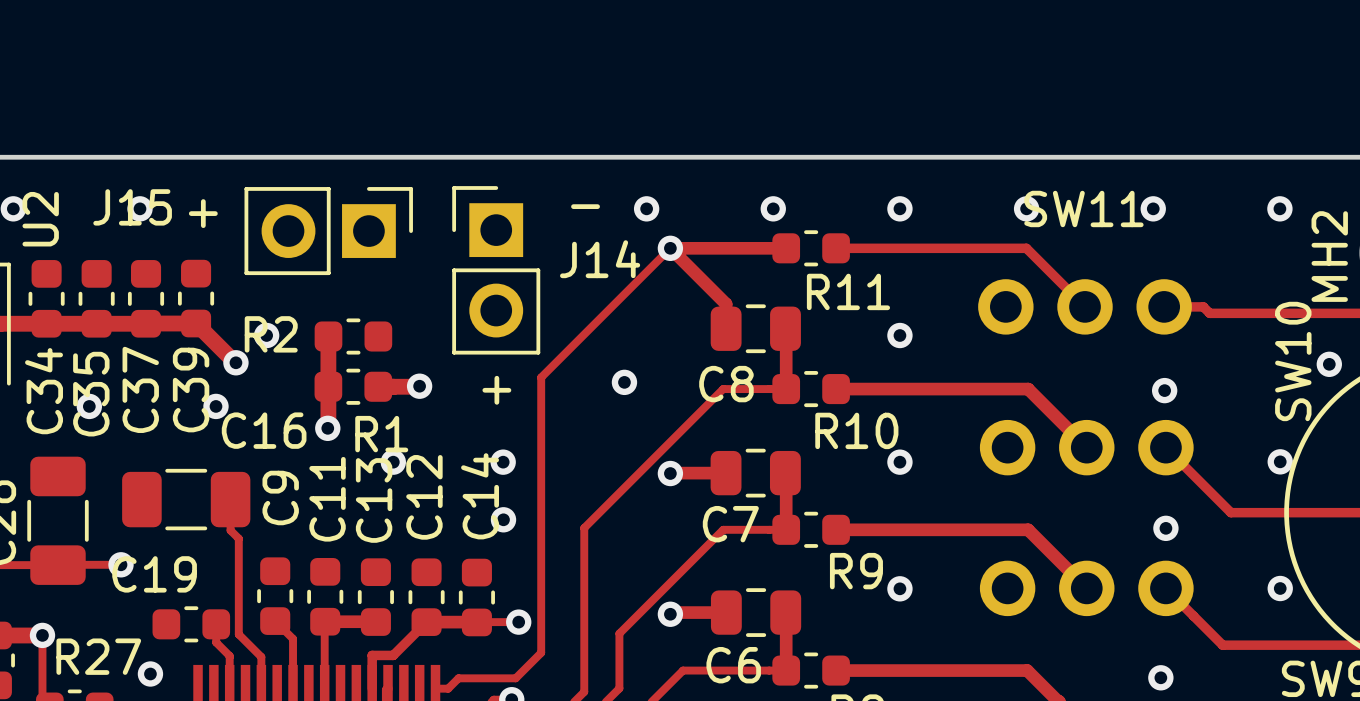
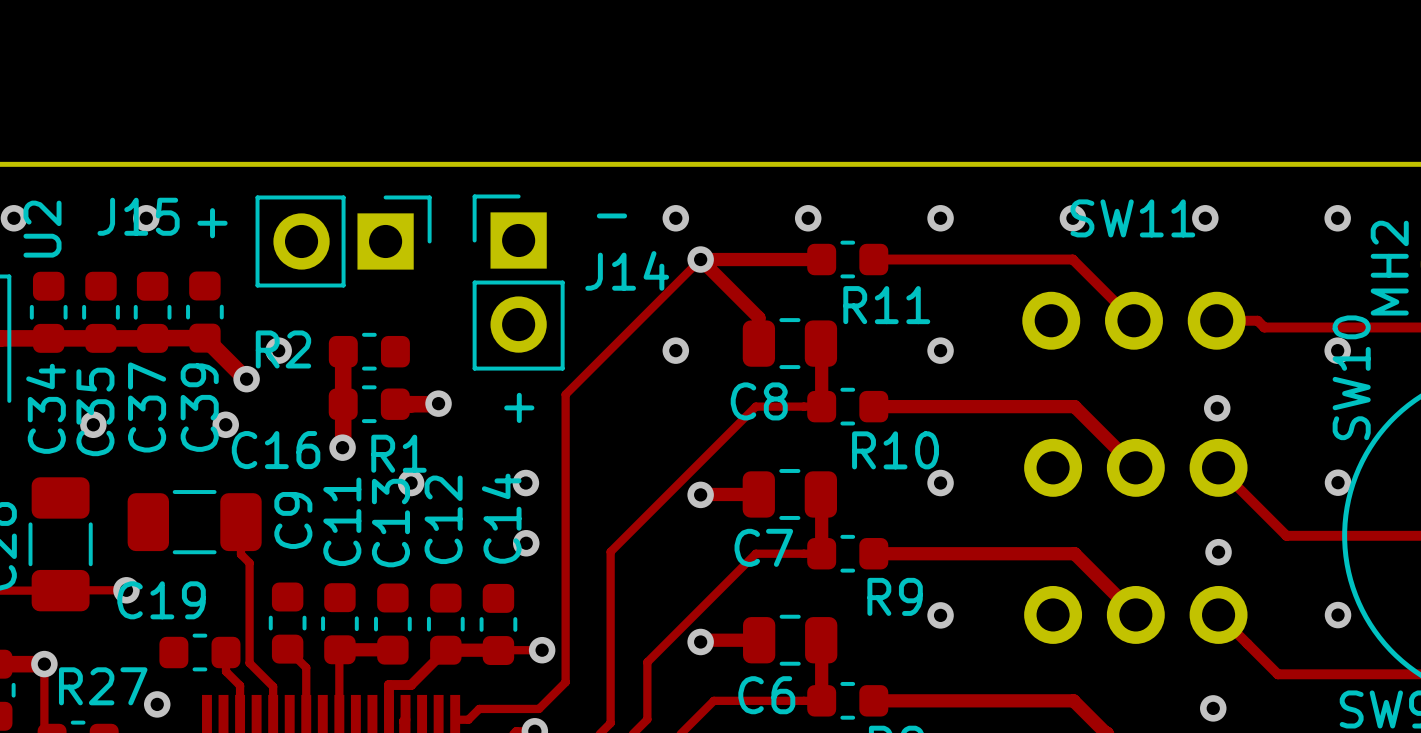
via position: (1329, 364) -> (1337, 350)
via position: (624, 382) -> (675, 350)

